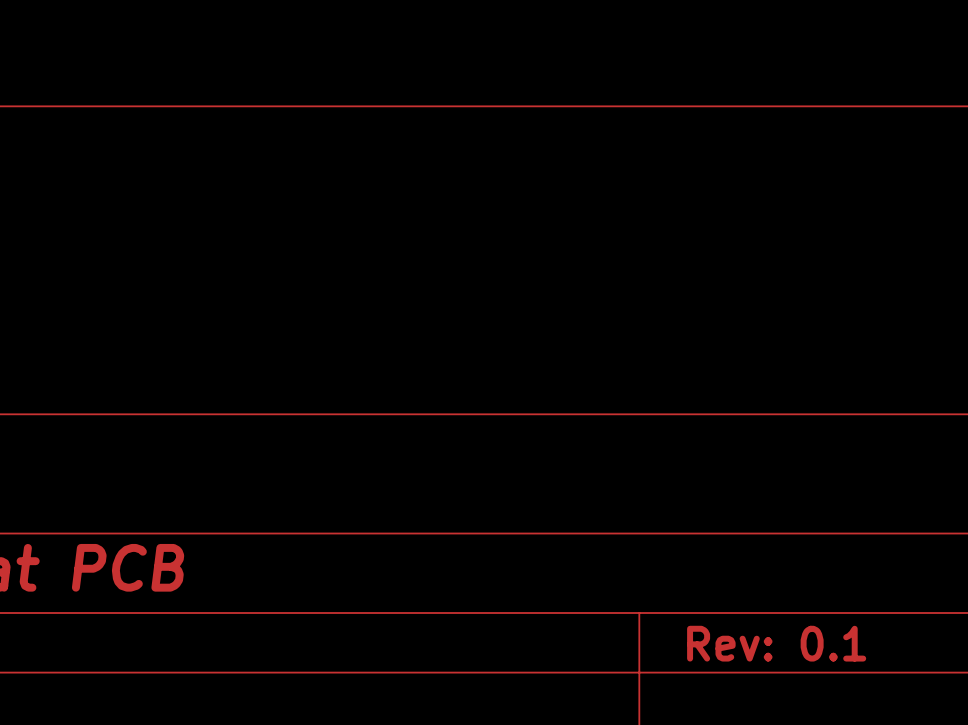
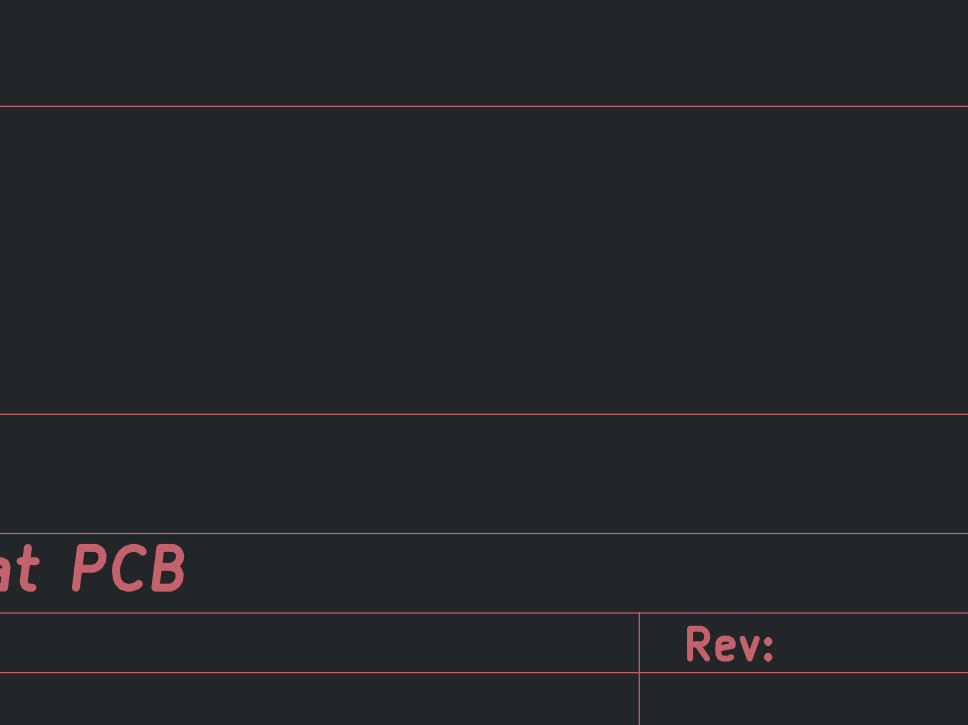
title block: Rev: 0.1 (776, 643) -> Rev: (729, 643)

